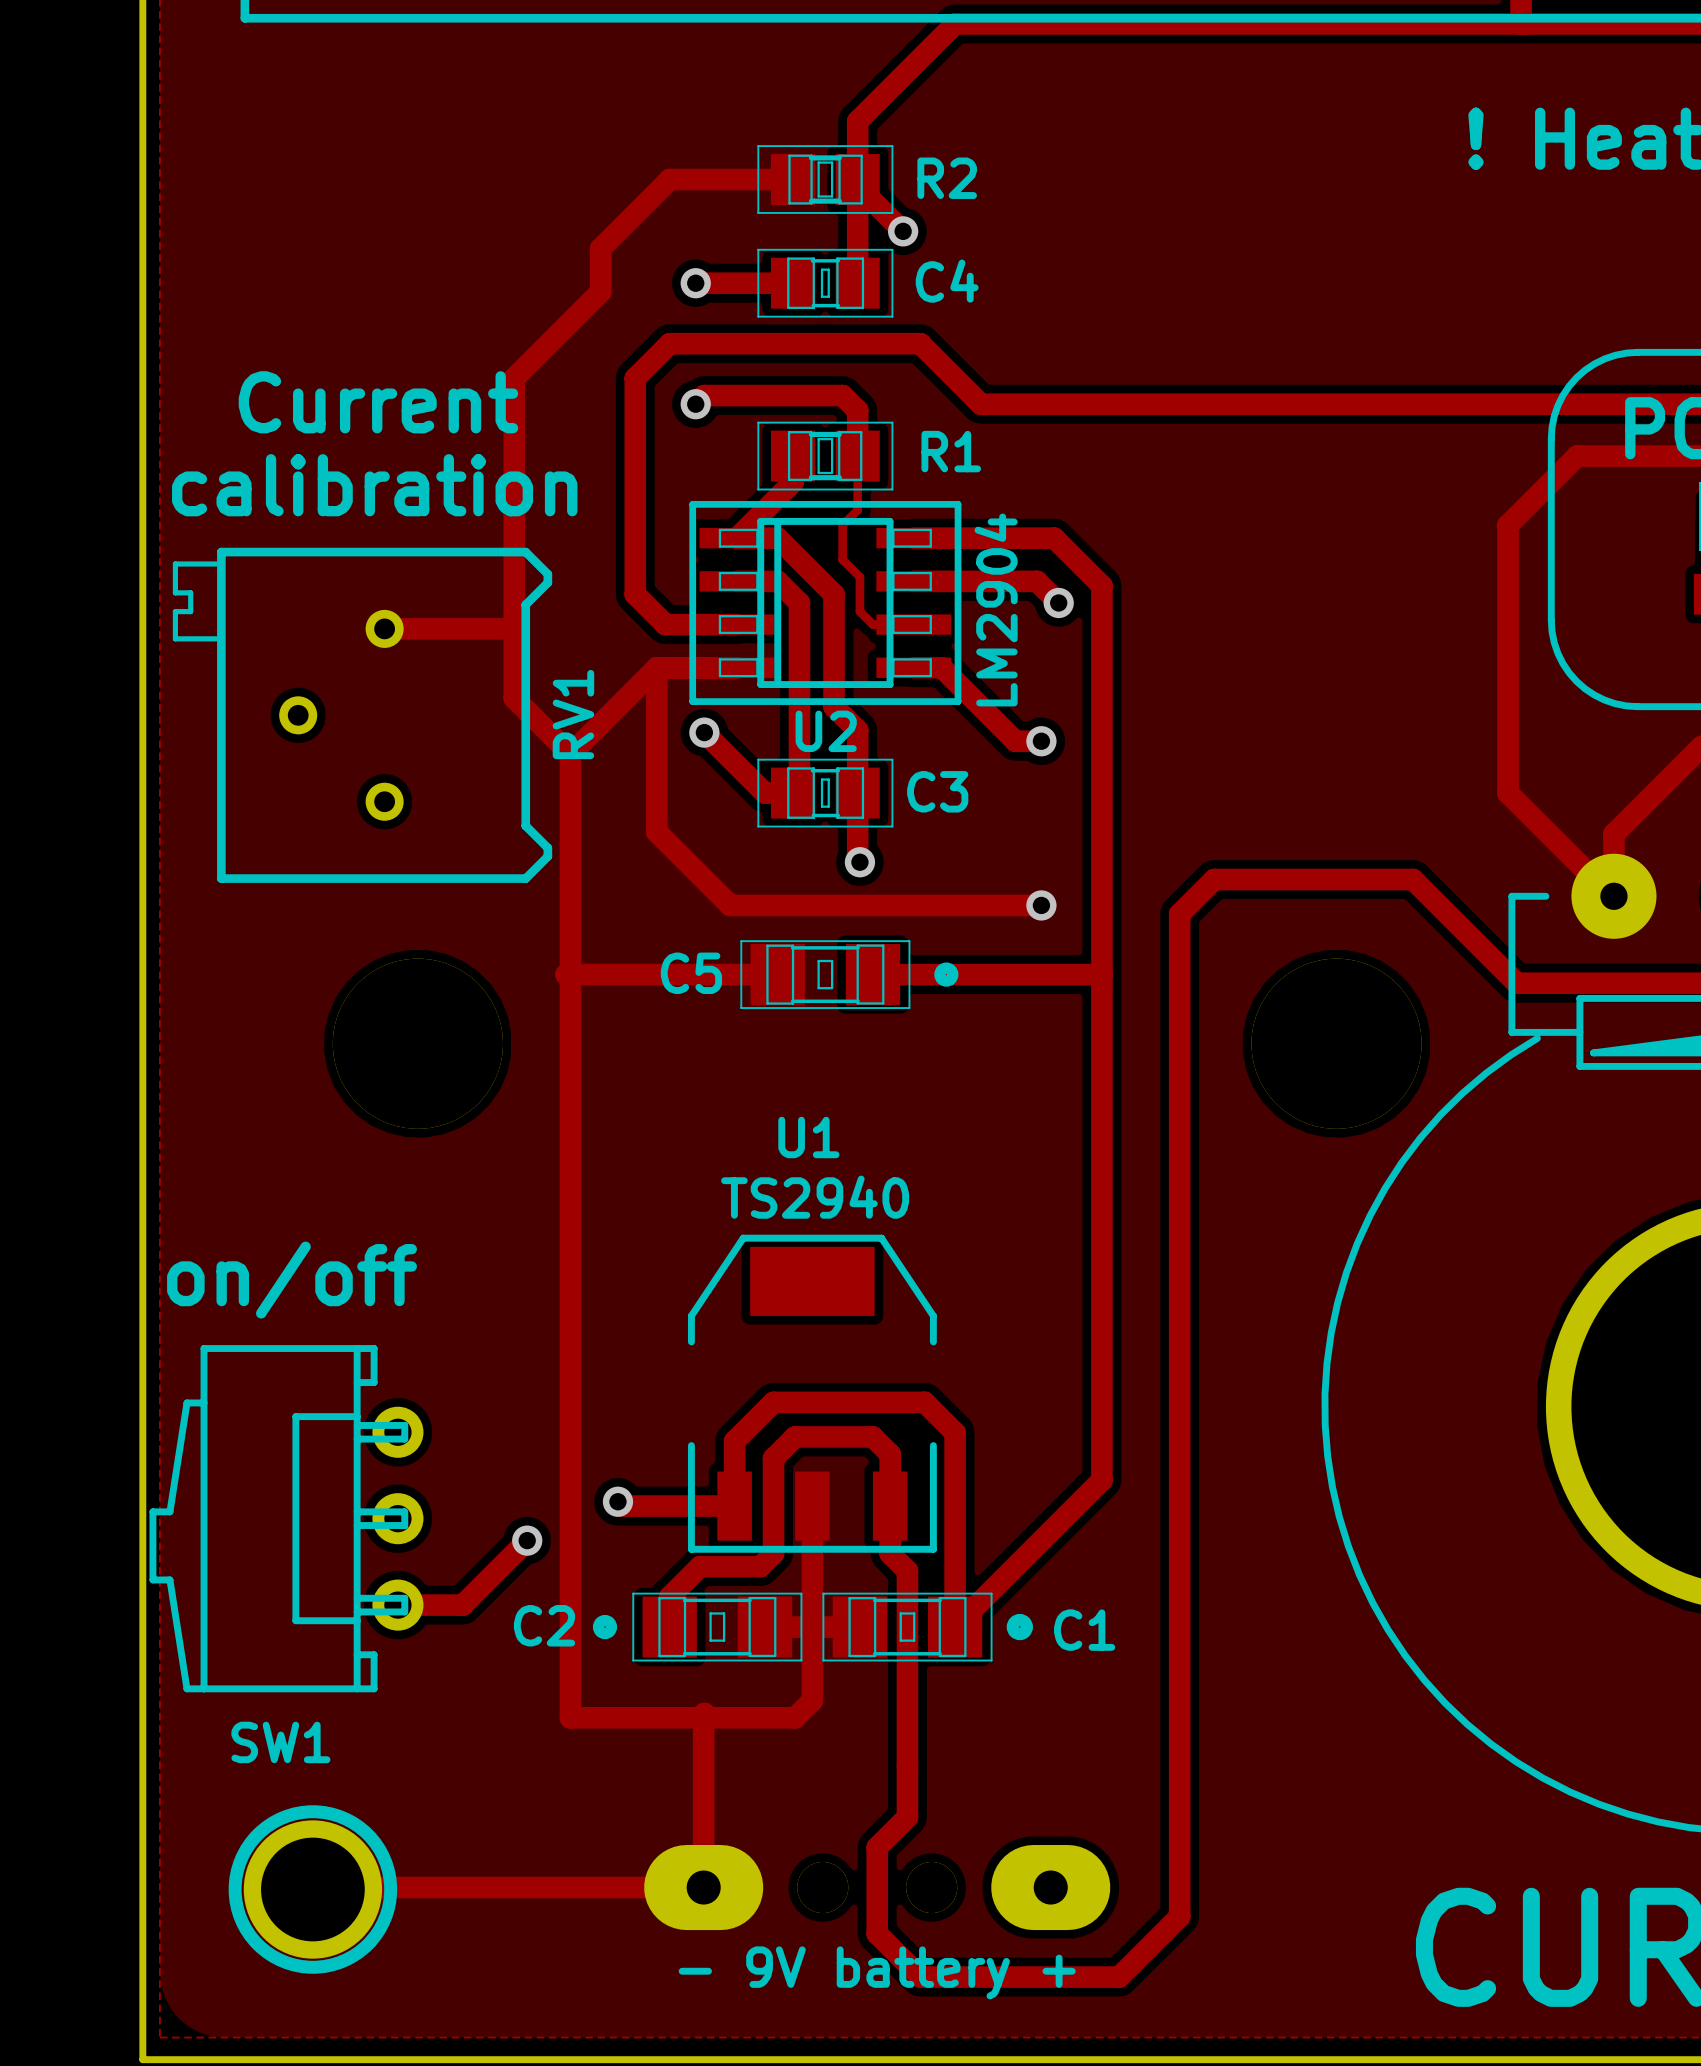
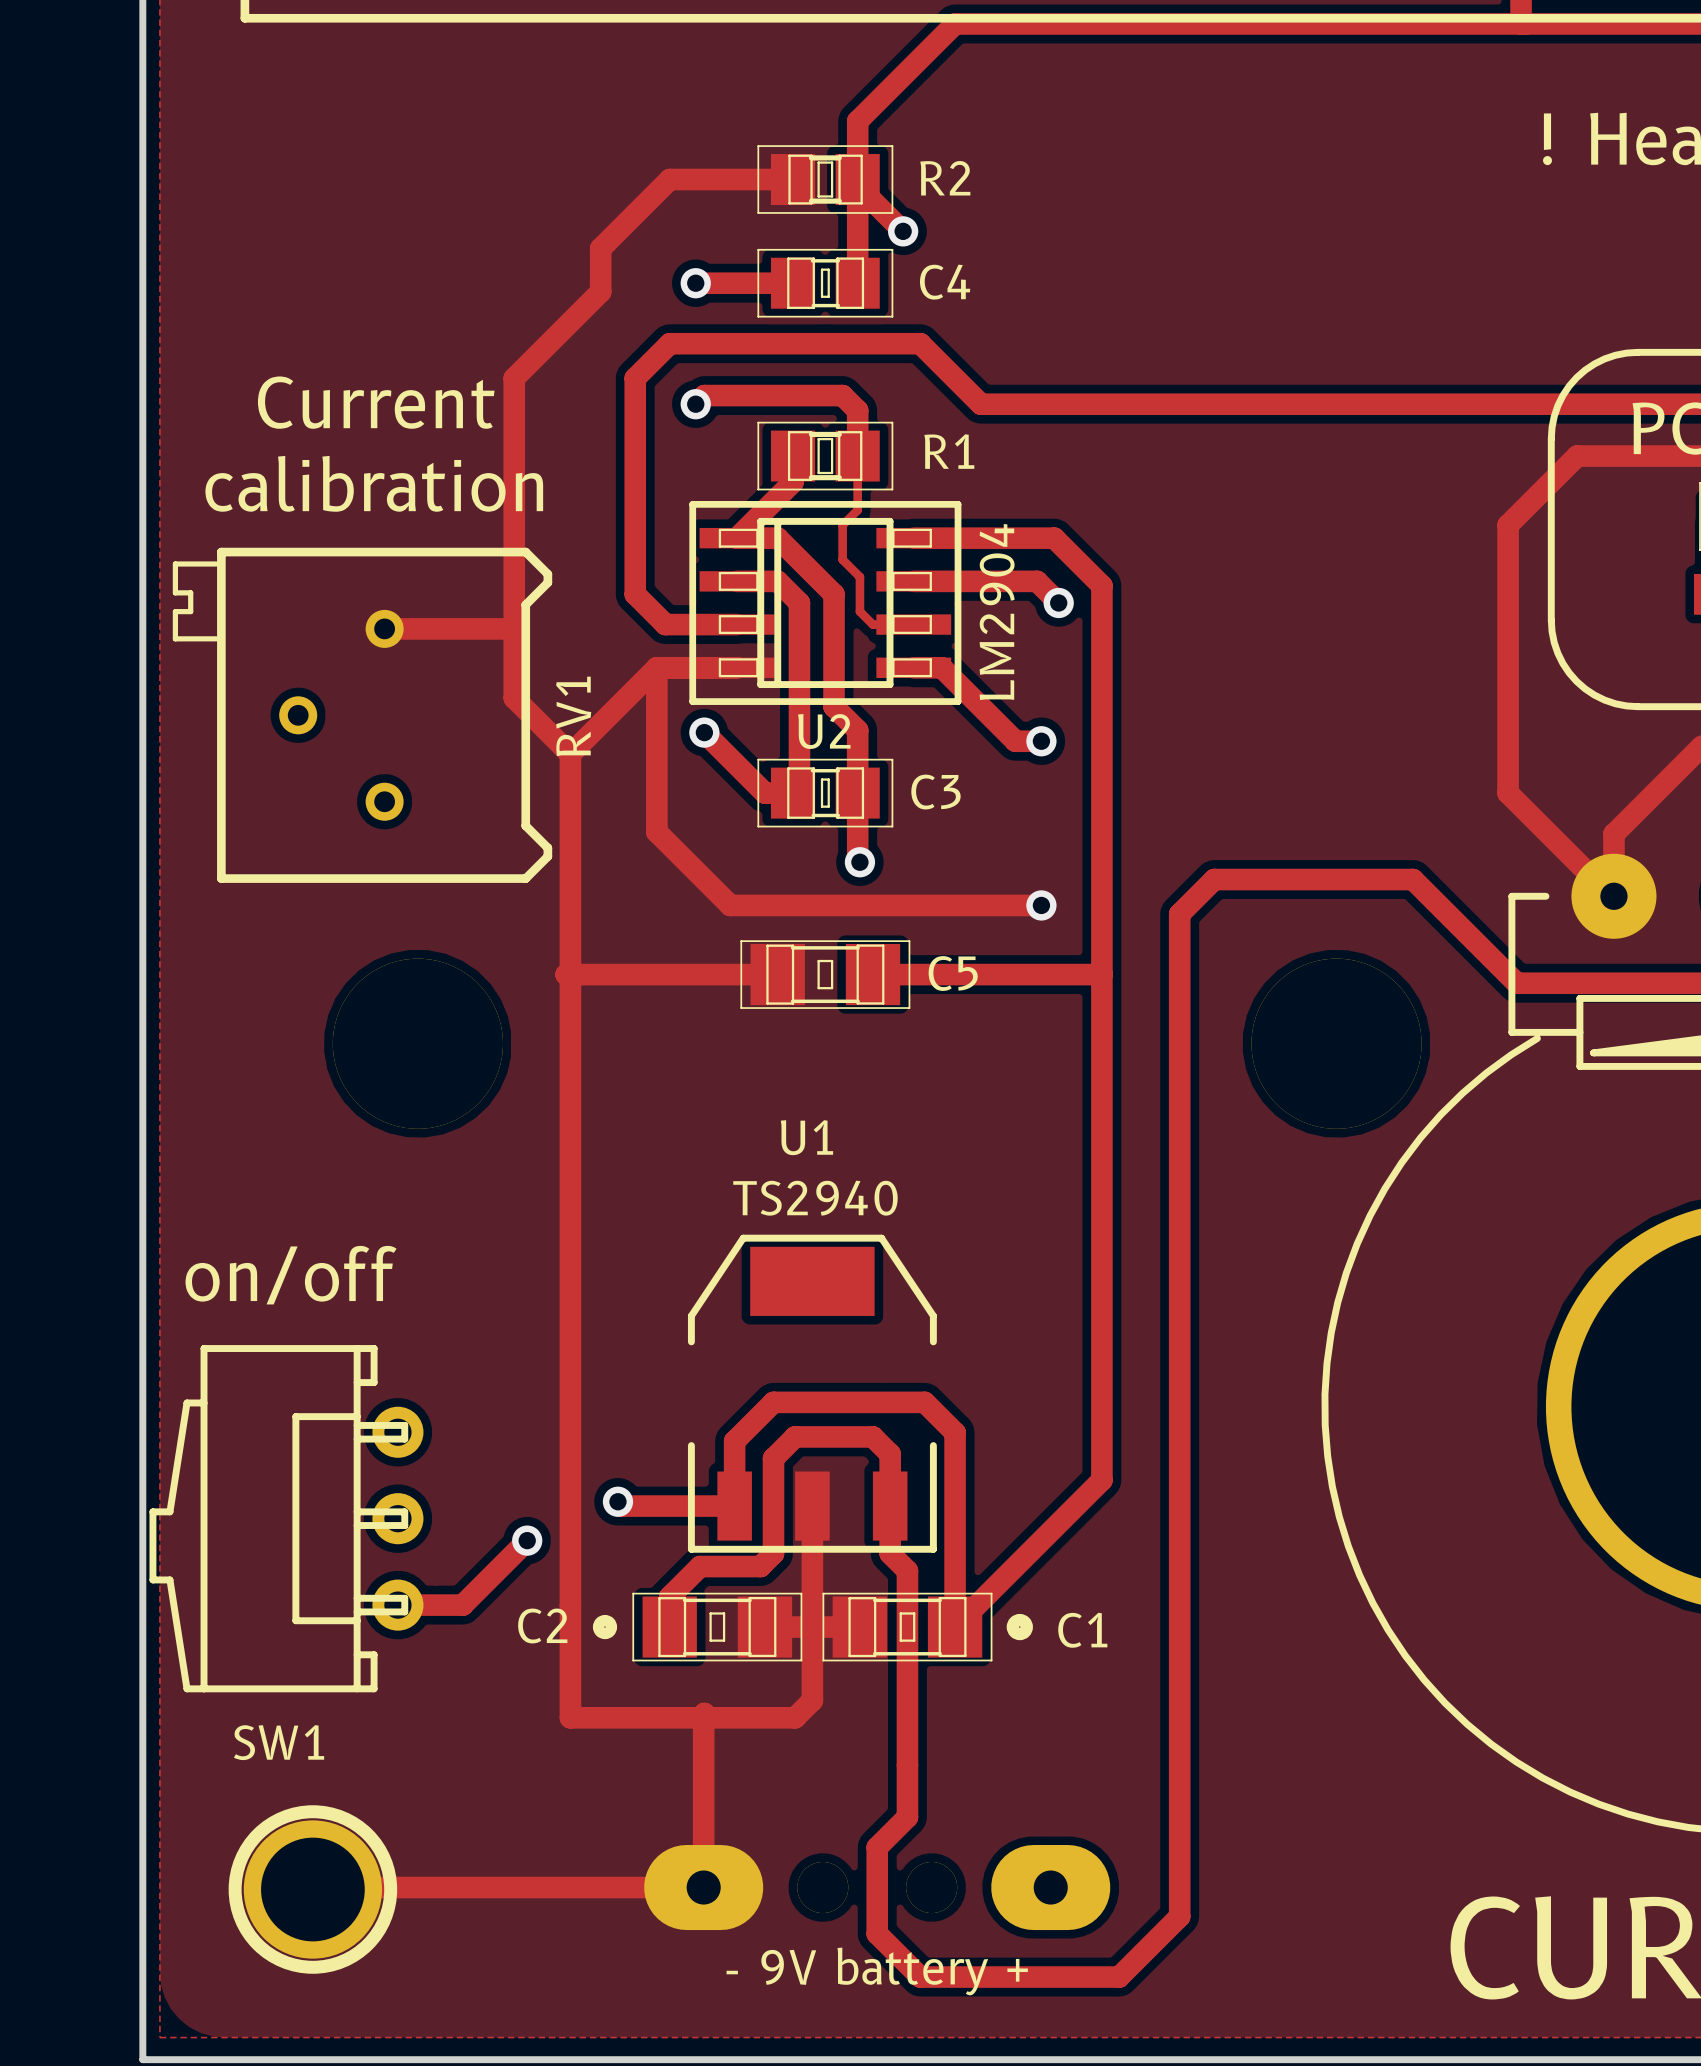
drawing: [934, 962, 959, 987] -> none
C5 name position: C5 (691, 973) -> C5 (953, 973)

